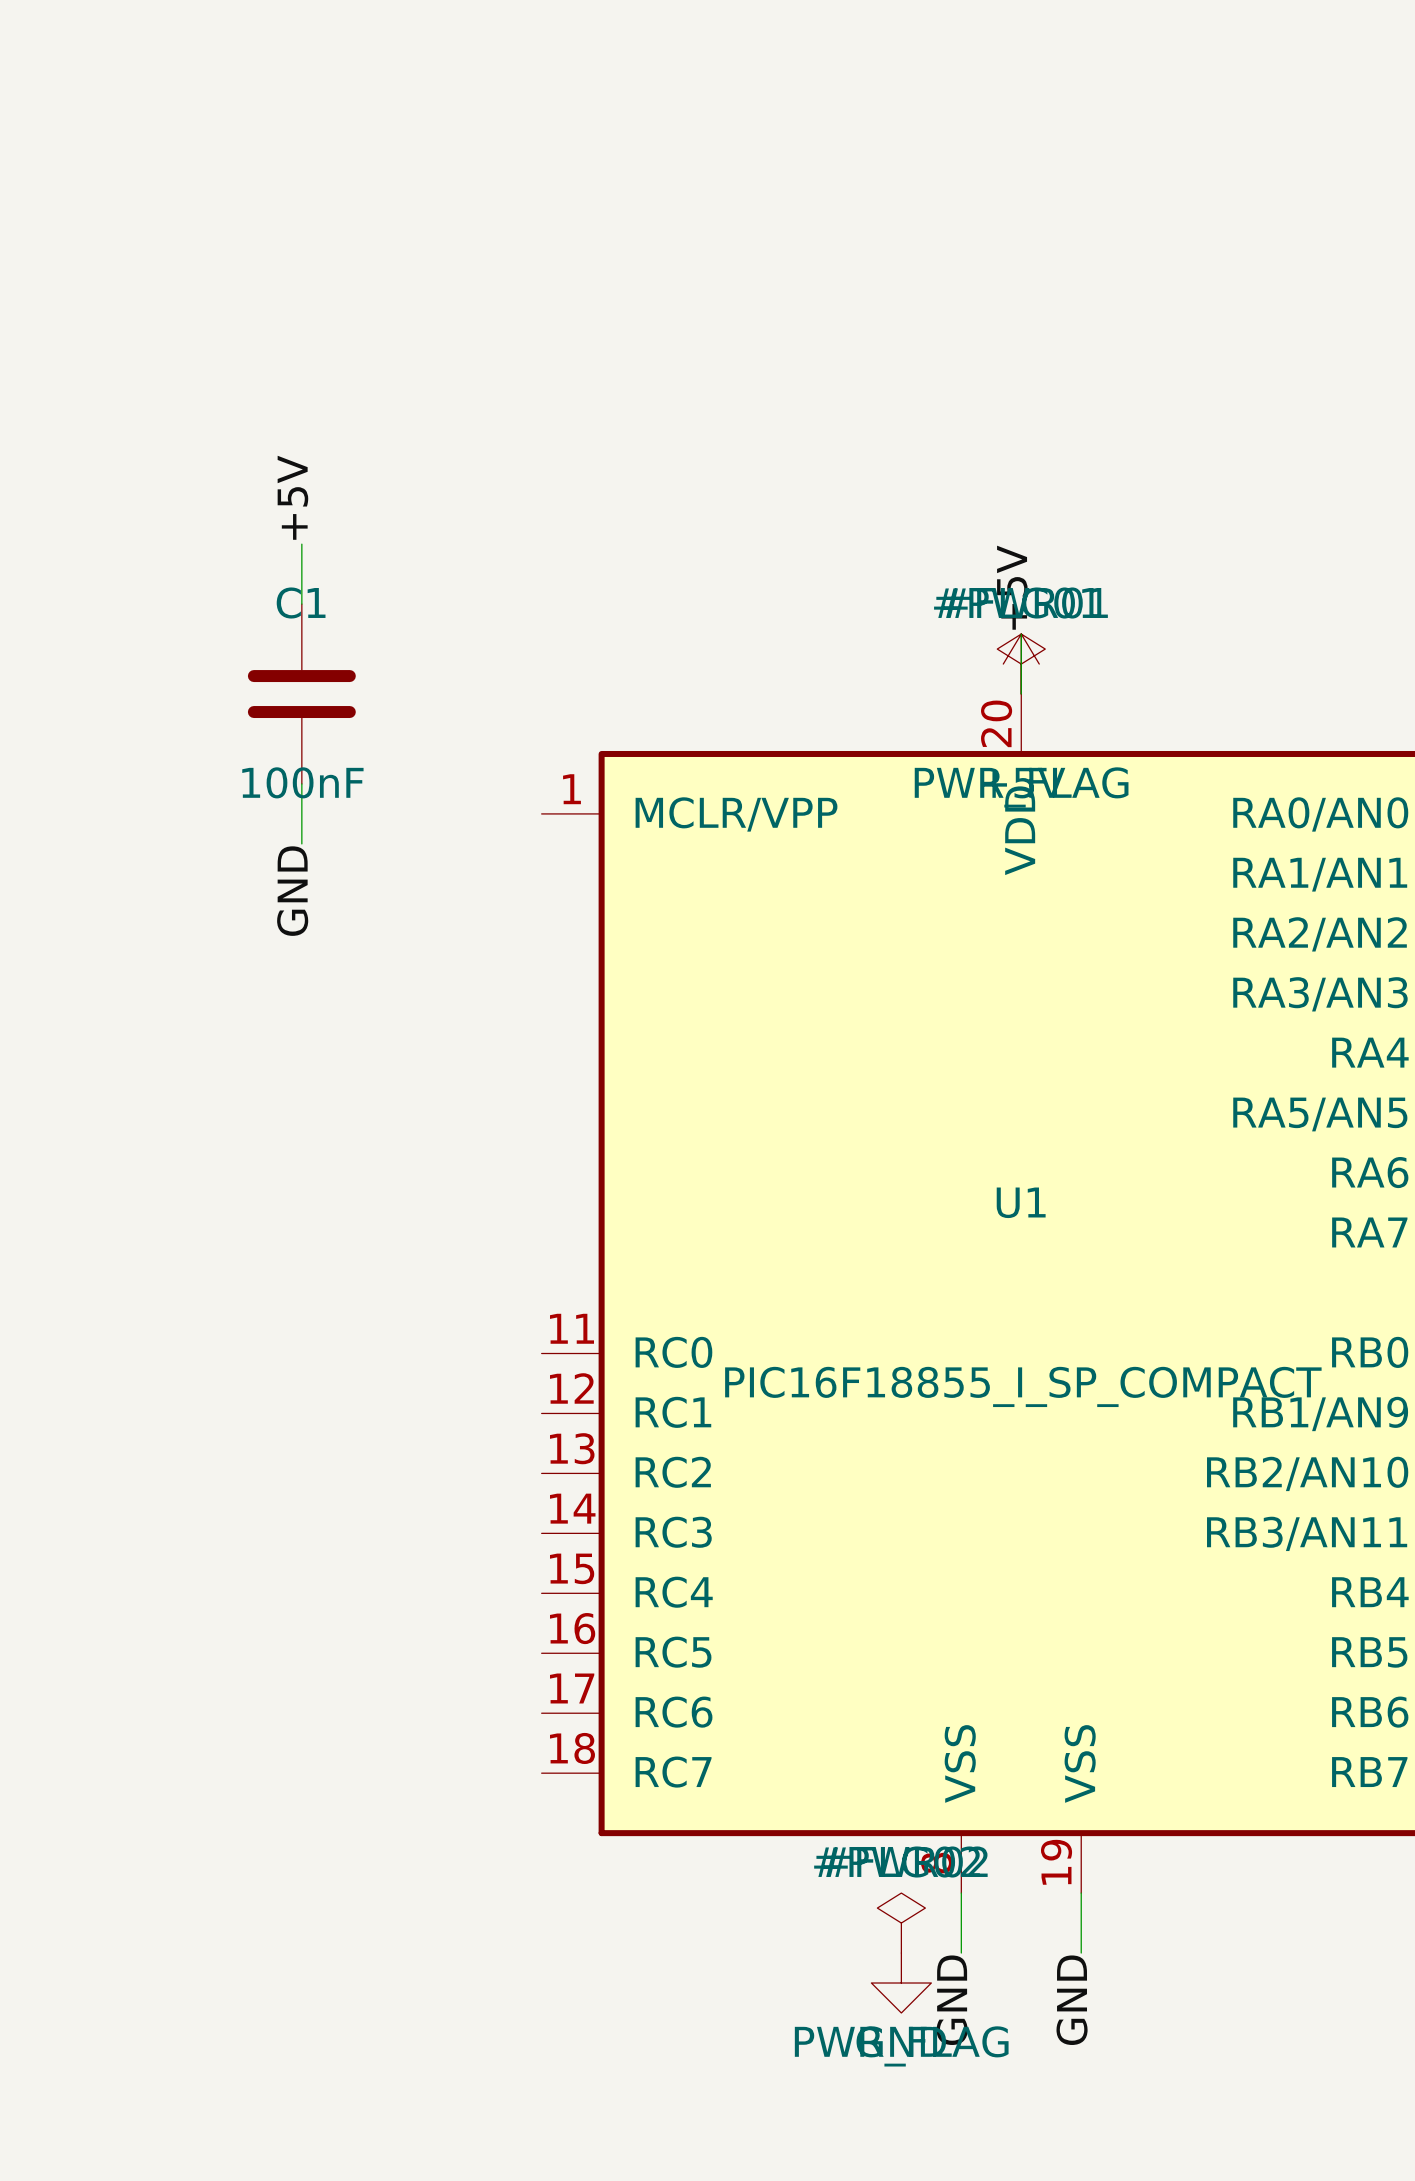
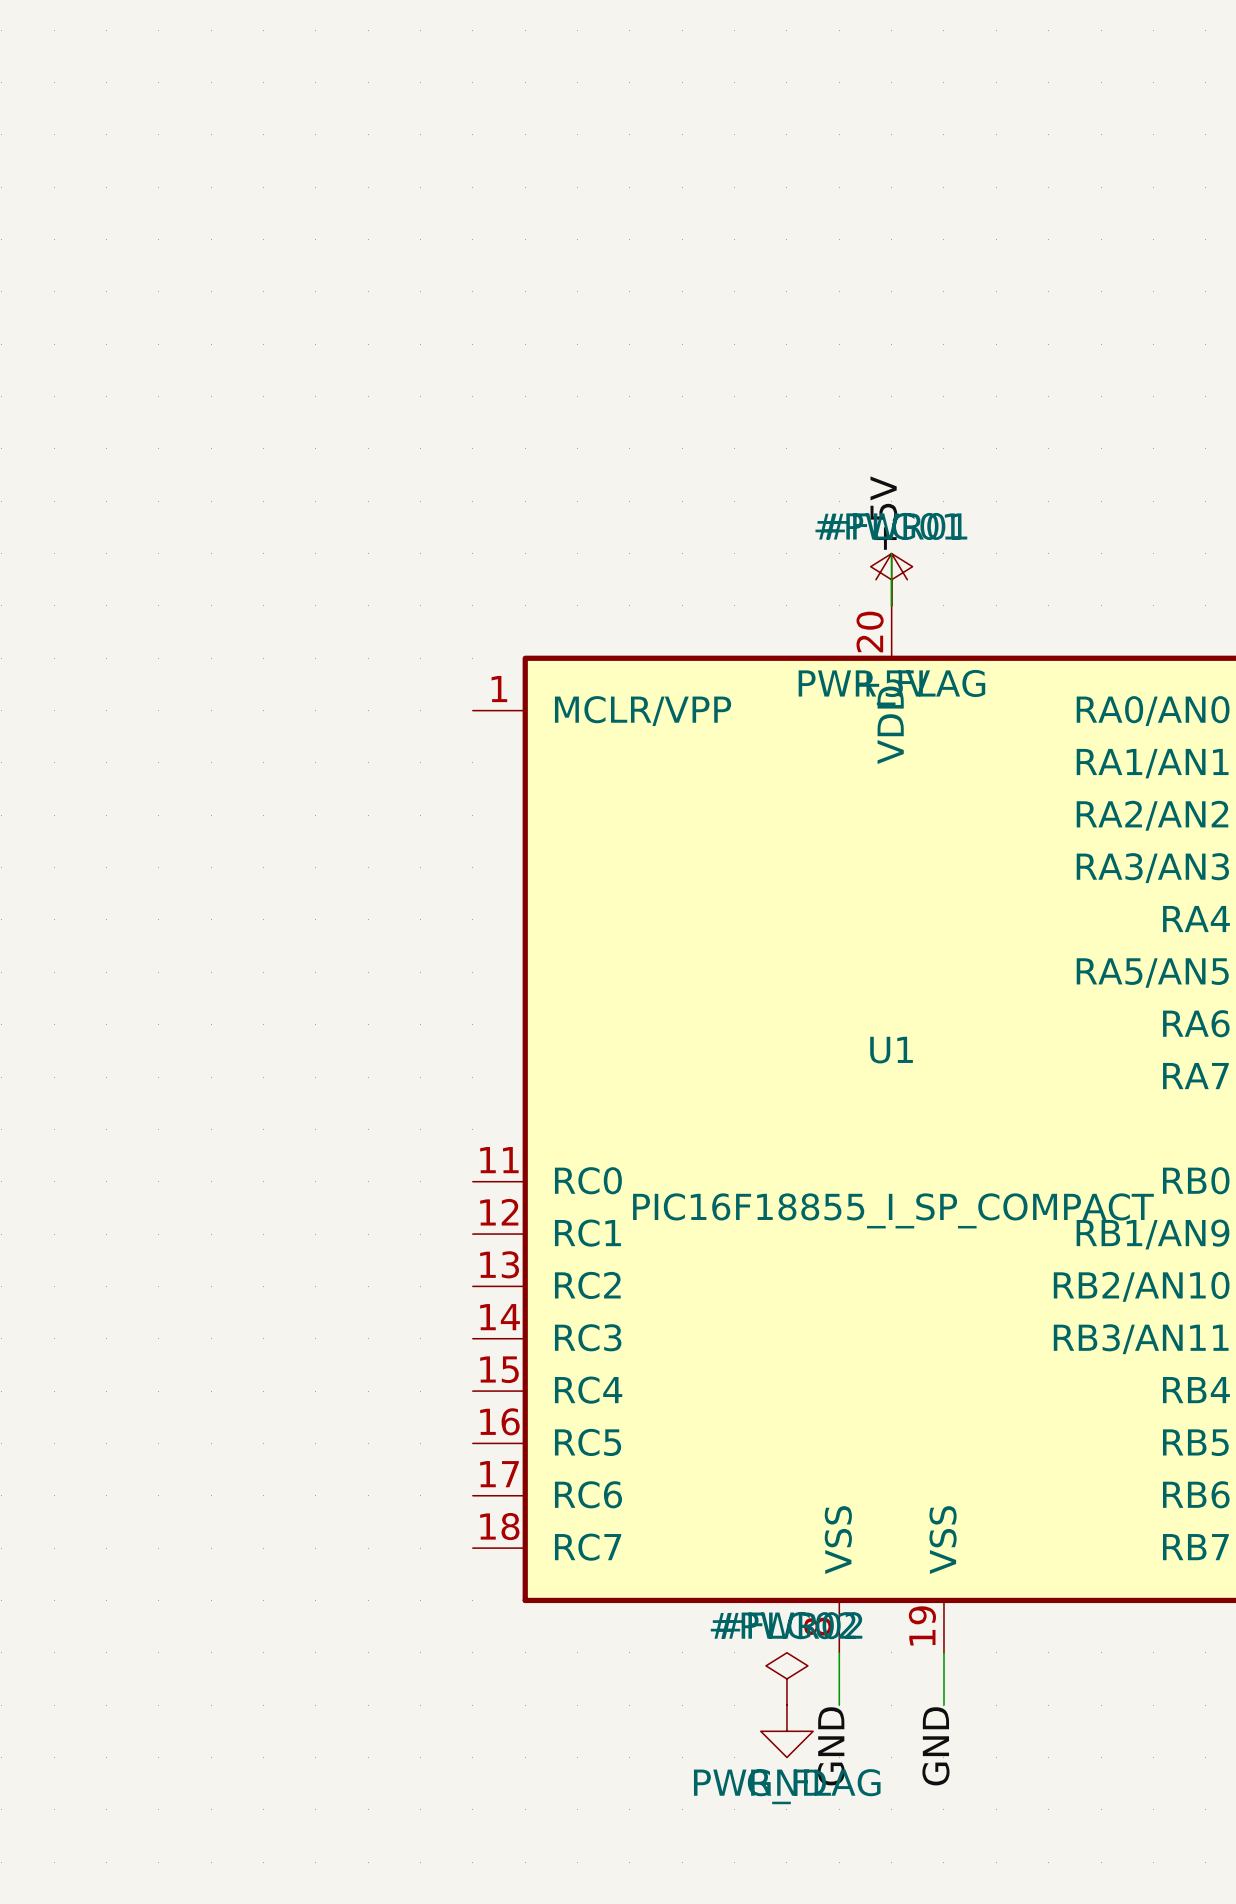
label: +5V (292, 497) -> none
wire: (301, 544) (301, 604) -> none
C1: 100nF (301, 694) -> none
wire: (301, 783) (301, 843) -> none
label: GND (292, 891) -> none

